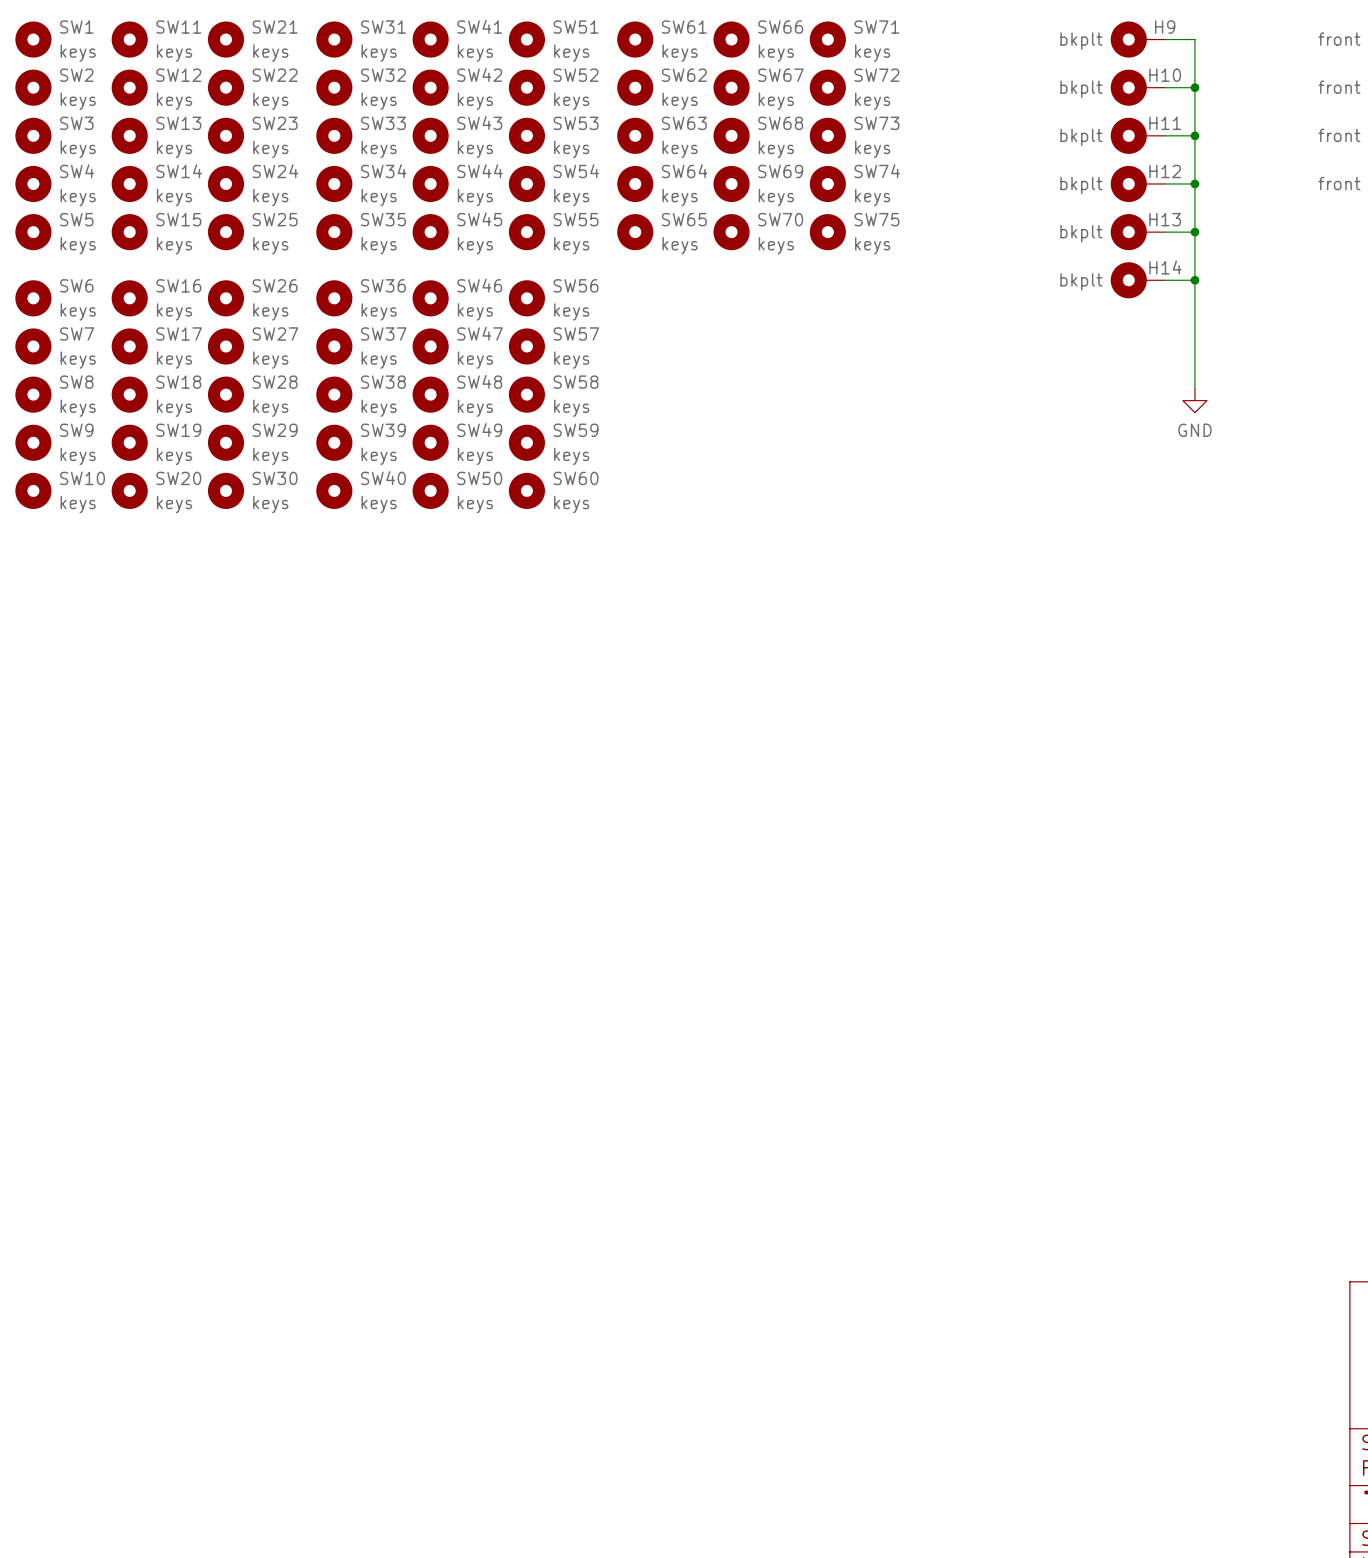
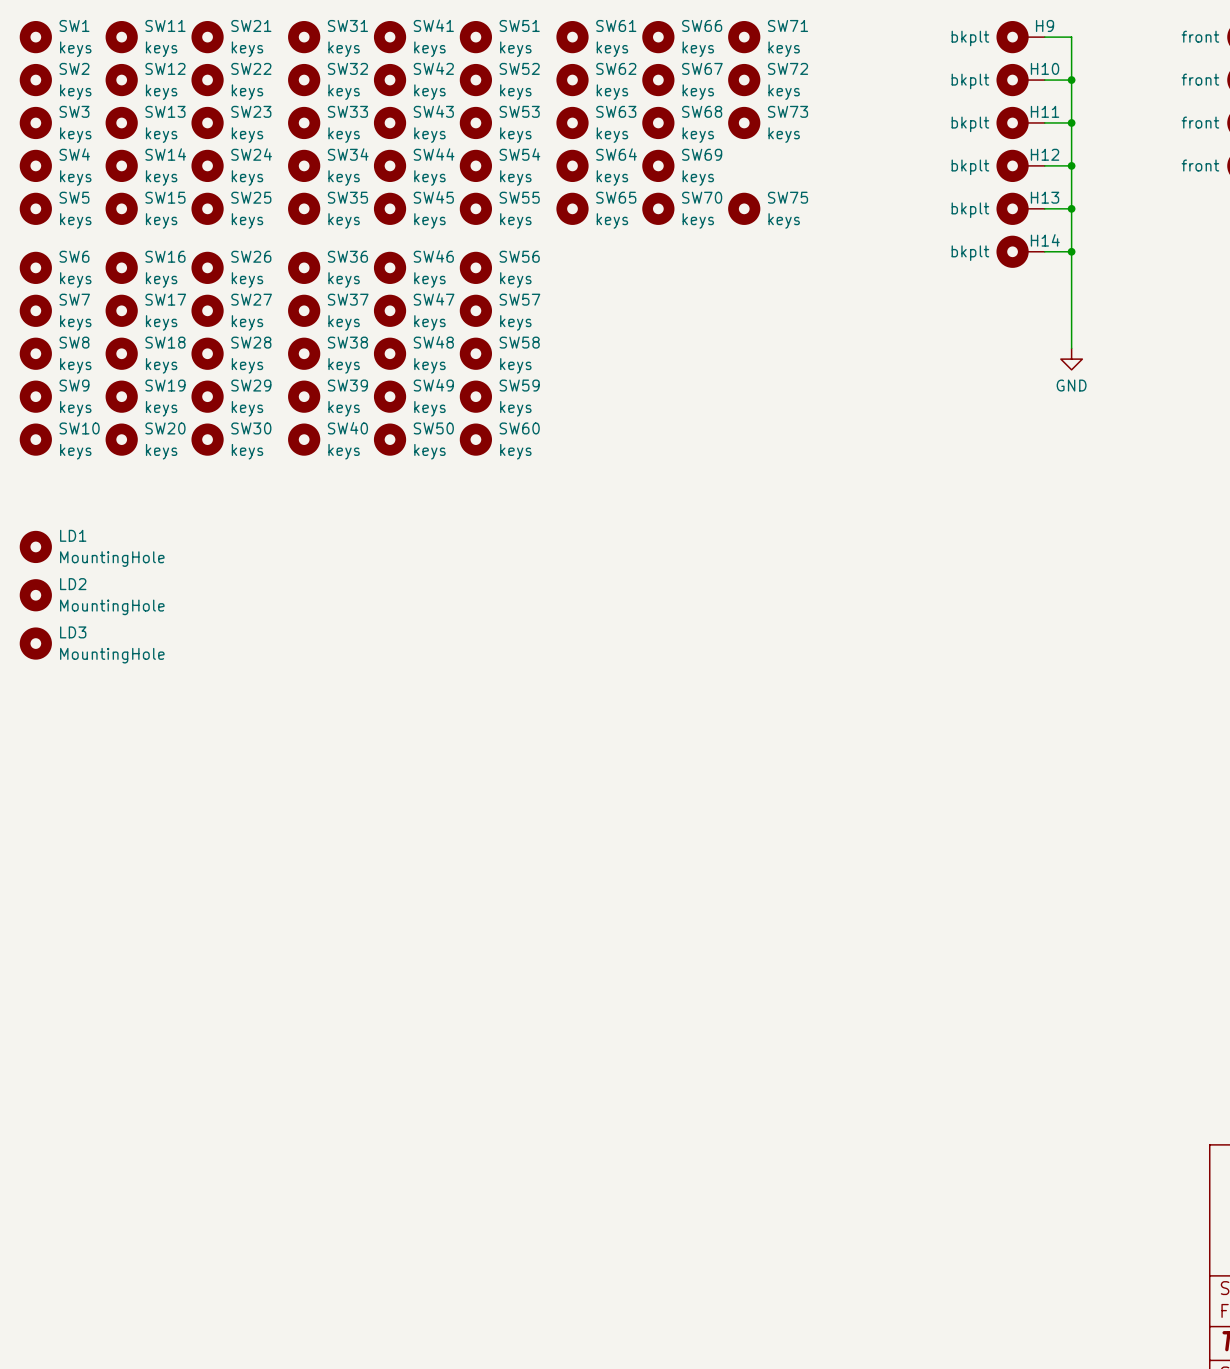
SW74: keys (827, 183) -> none
LD1: none -> MountingHole (35, 546)
LD2: none -> MountingHole (35, 595)
LD3: none -> MountingHole (35, 643)

